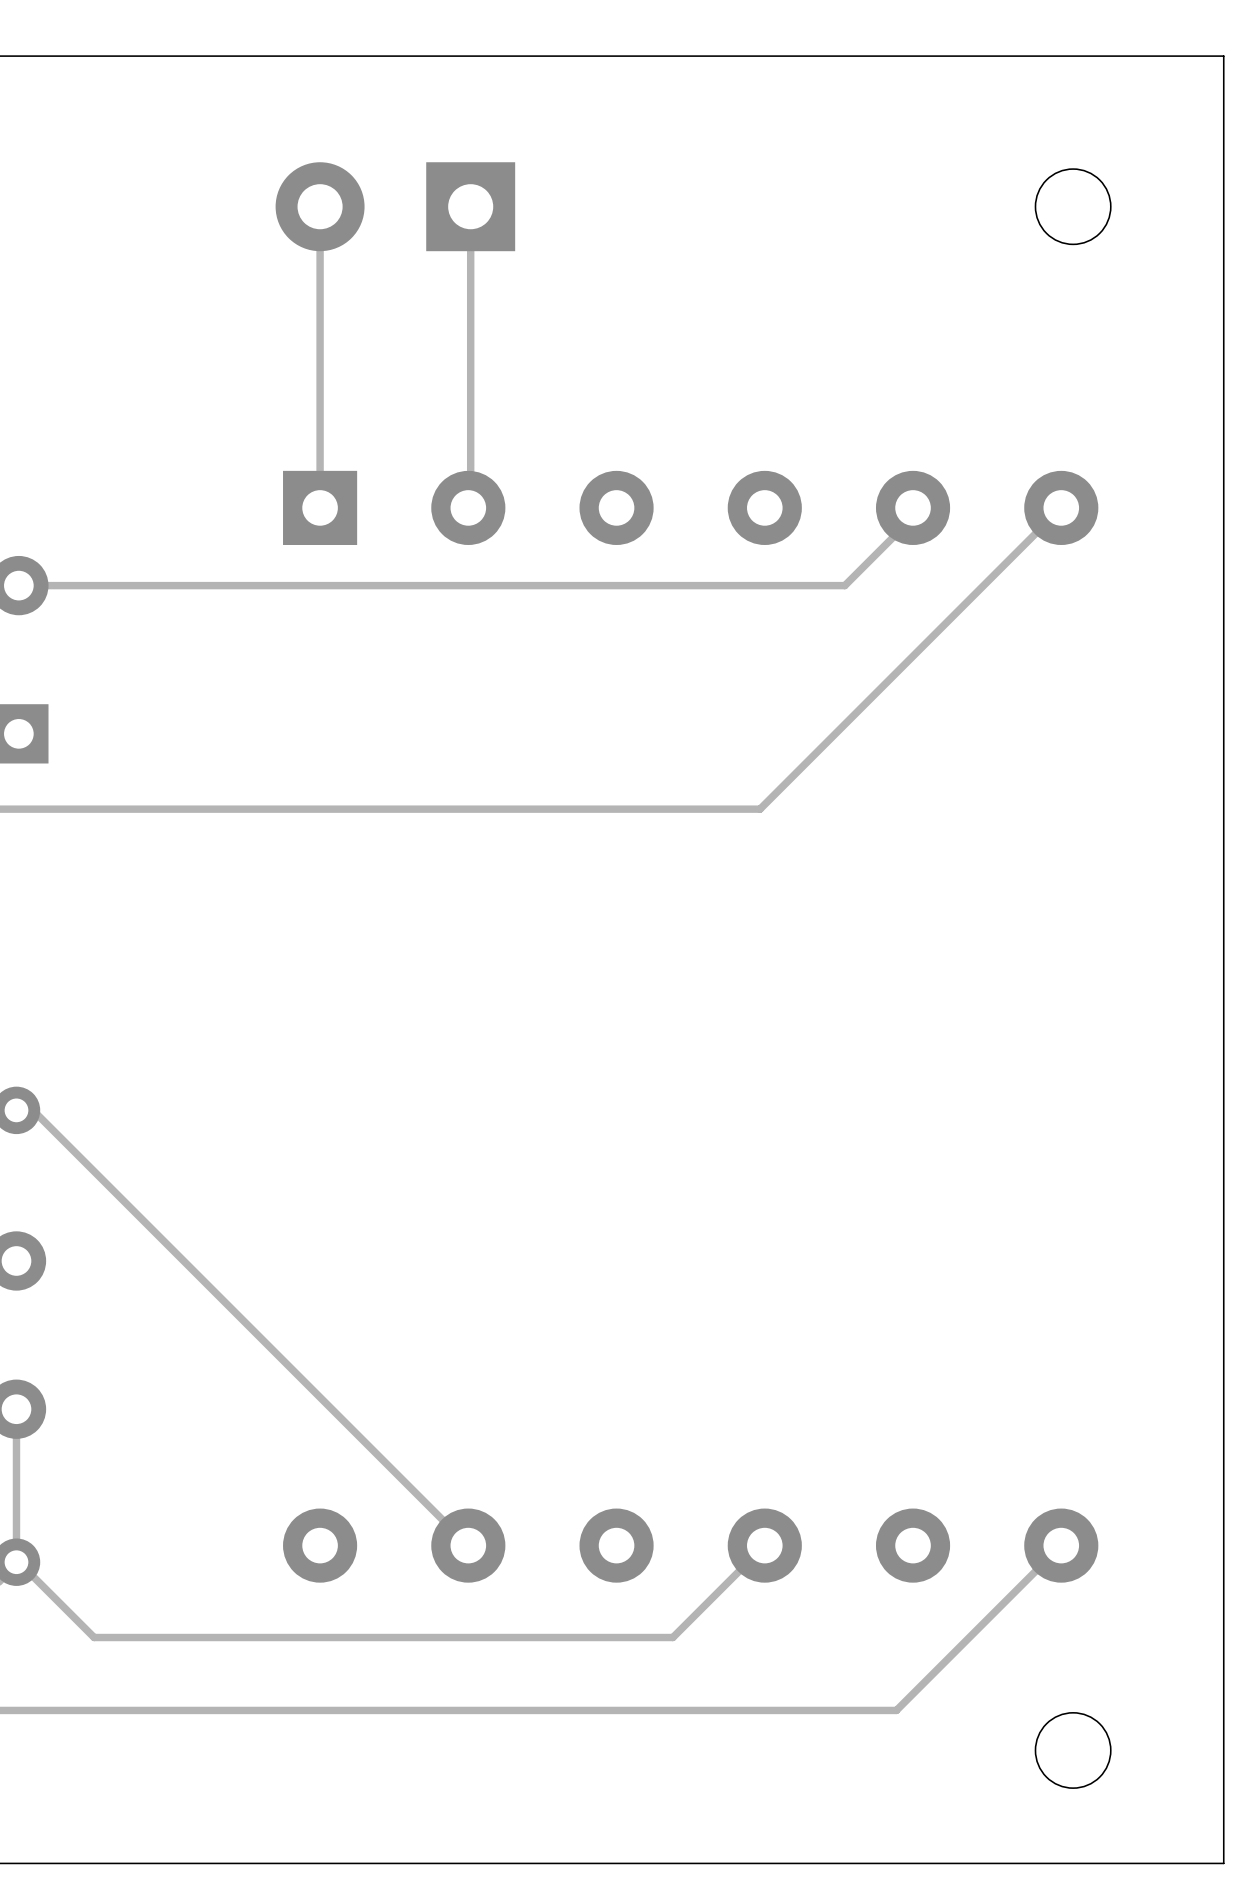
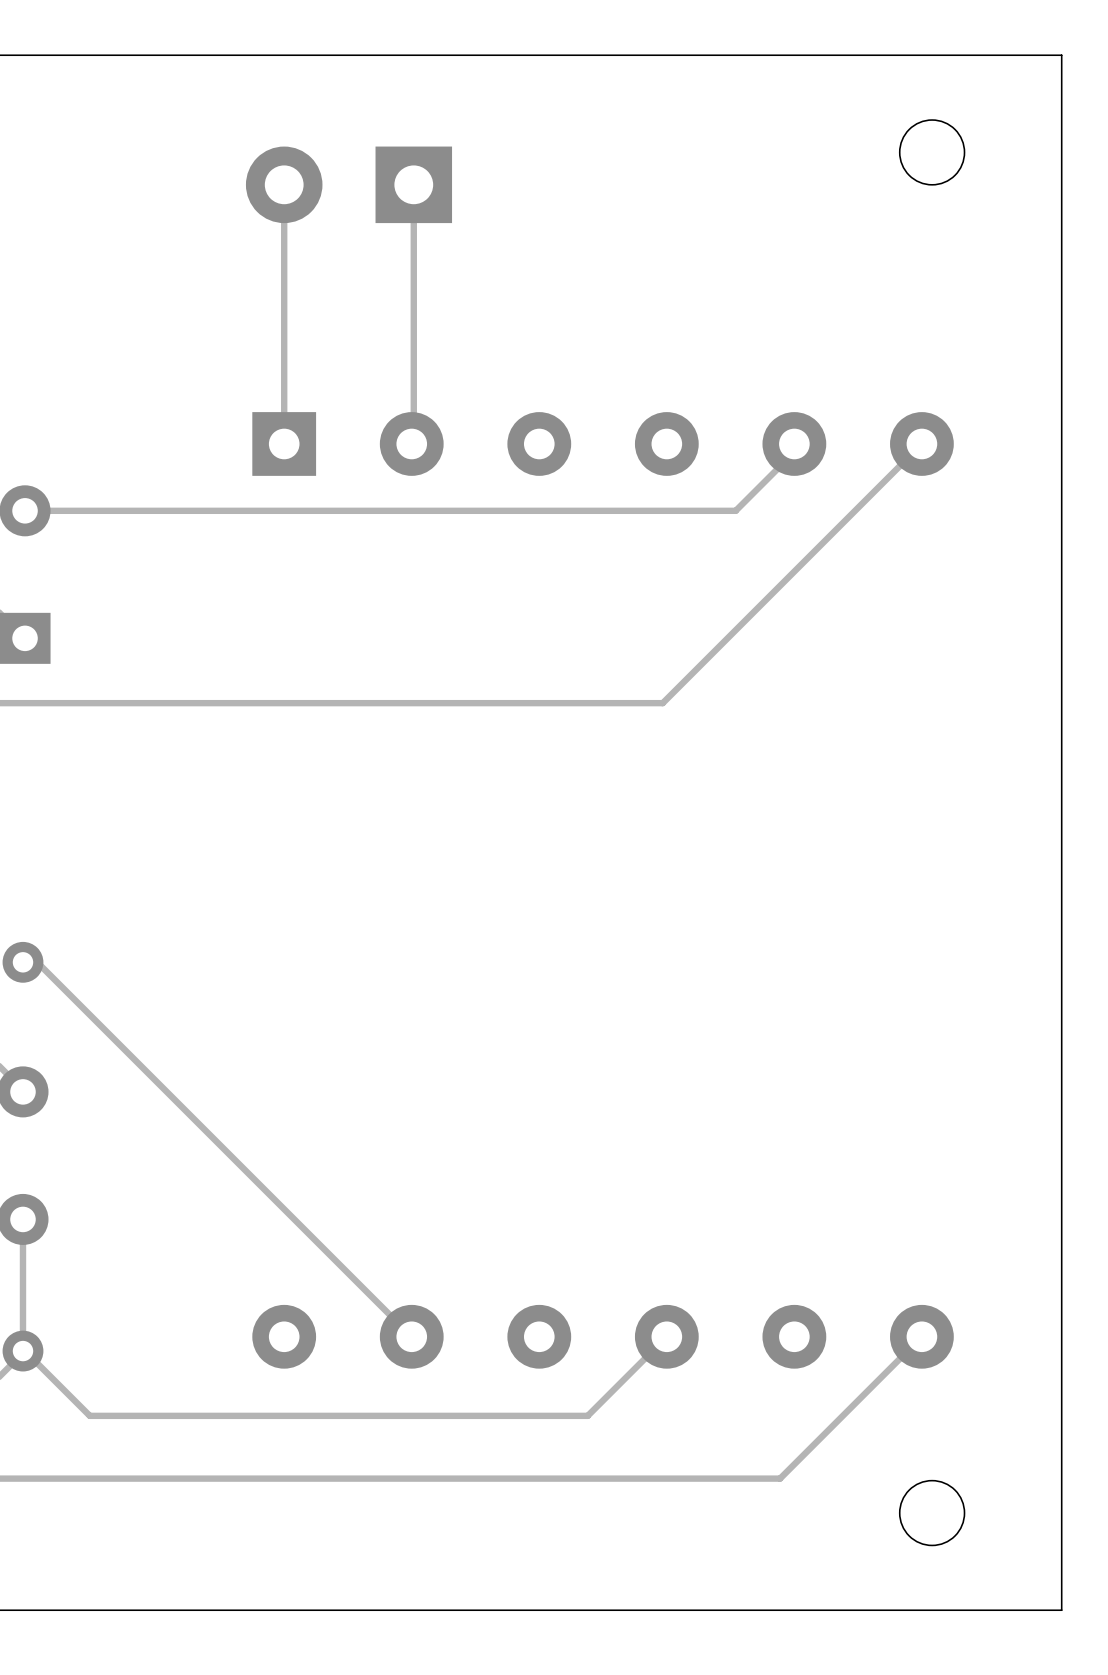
round board edge position: (1073, 206) -> (932, 152)

